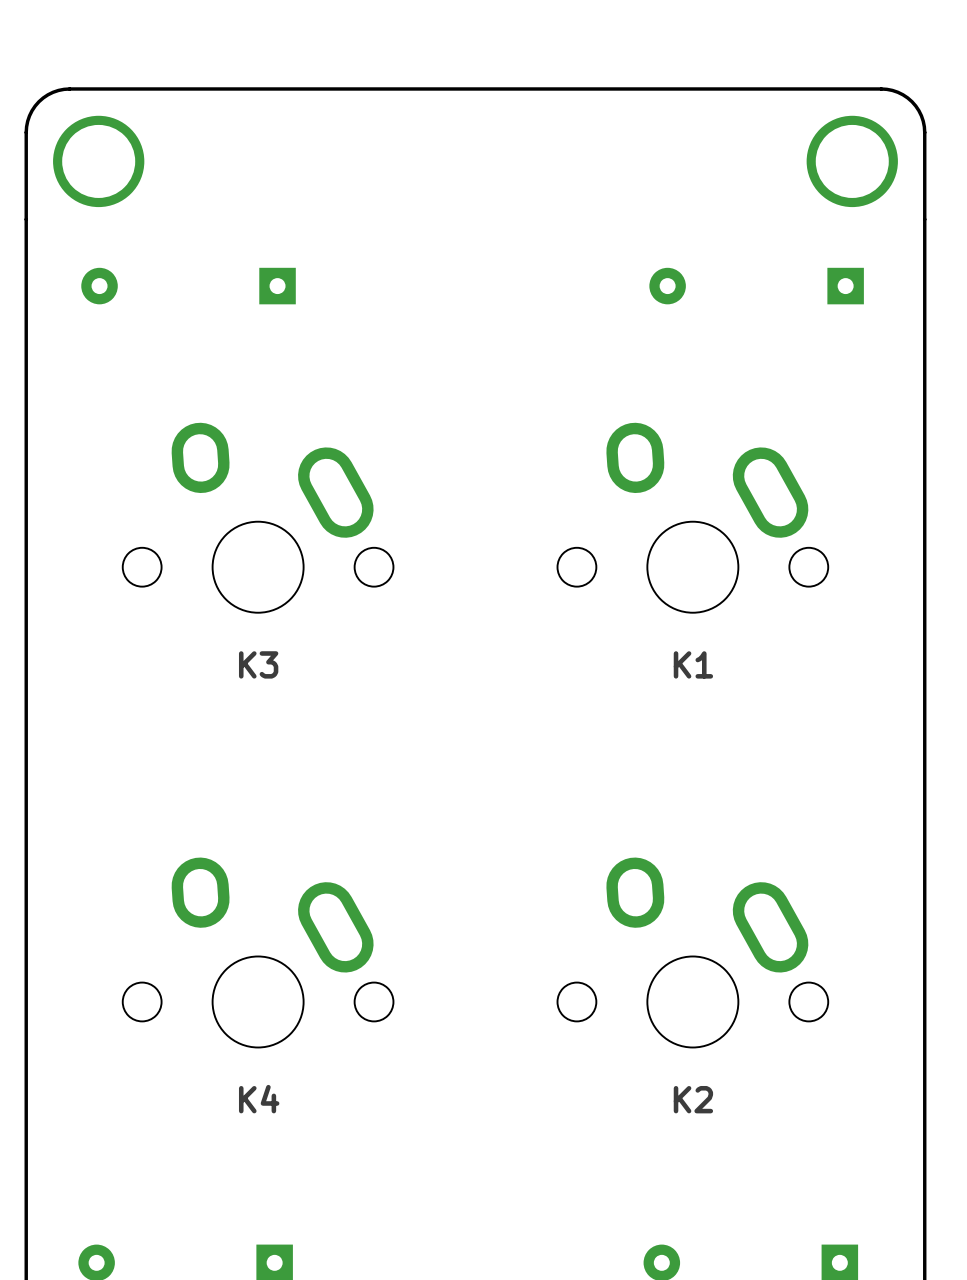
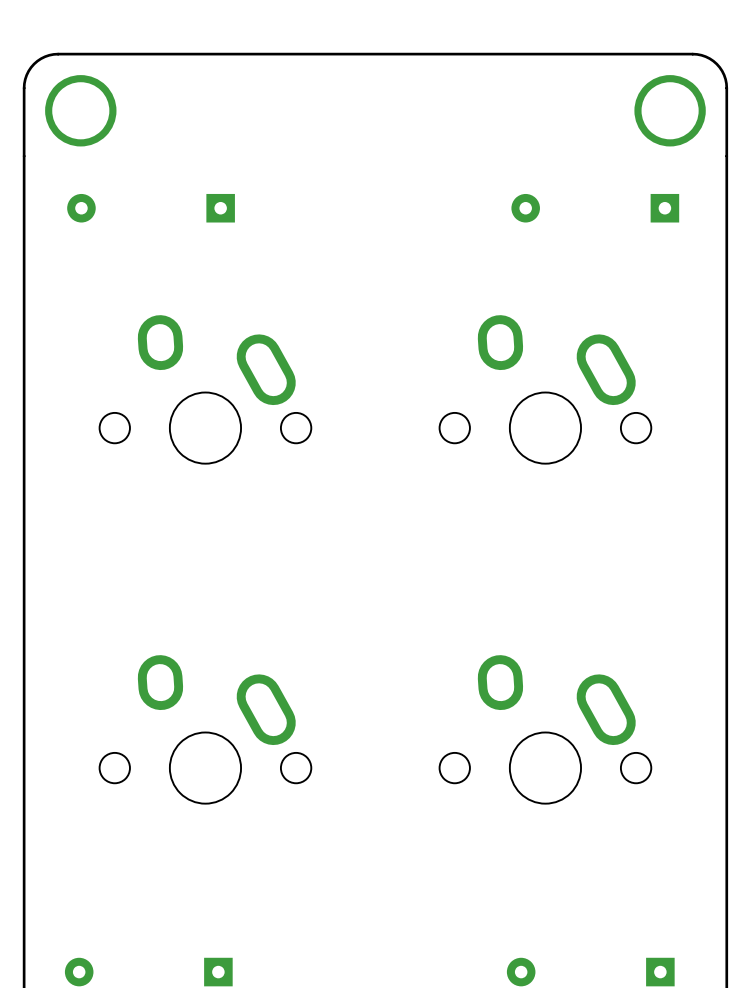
K3 name: K3 (258, 664) -> none
K1 name: K1 (693, 664) -> none
K4 name: K4 (259, 1099) -> none
K2 name: K2 (693, 1099) -> none

